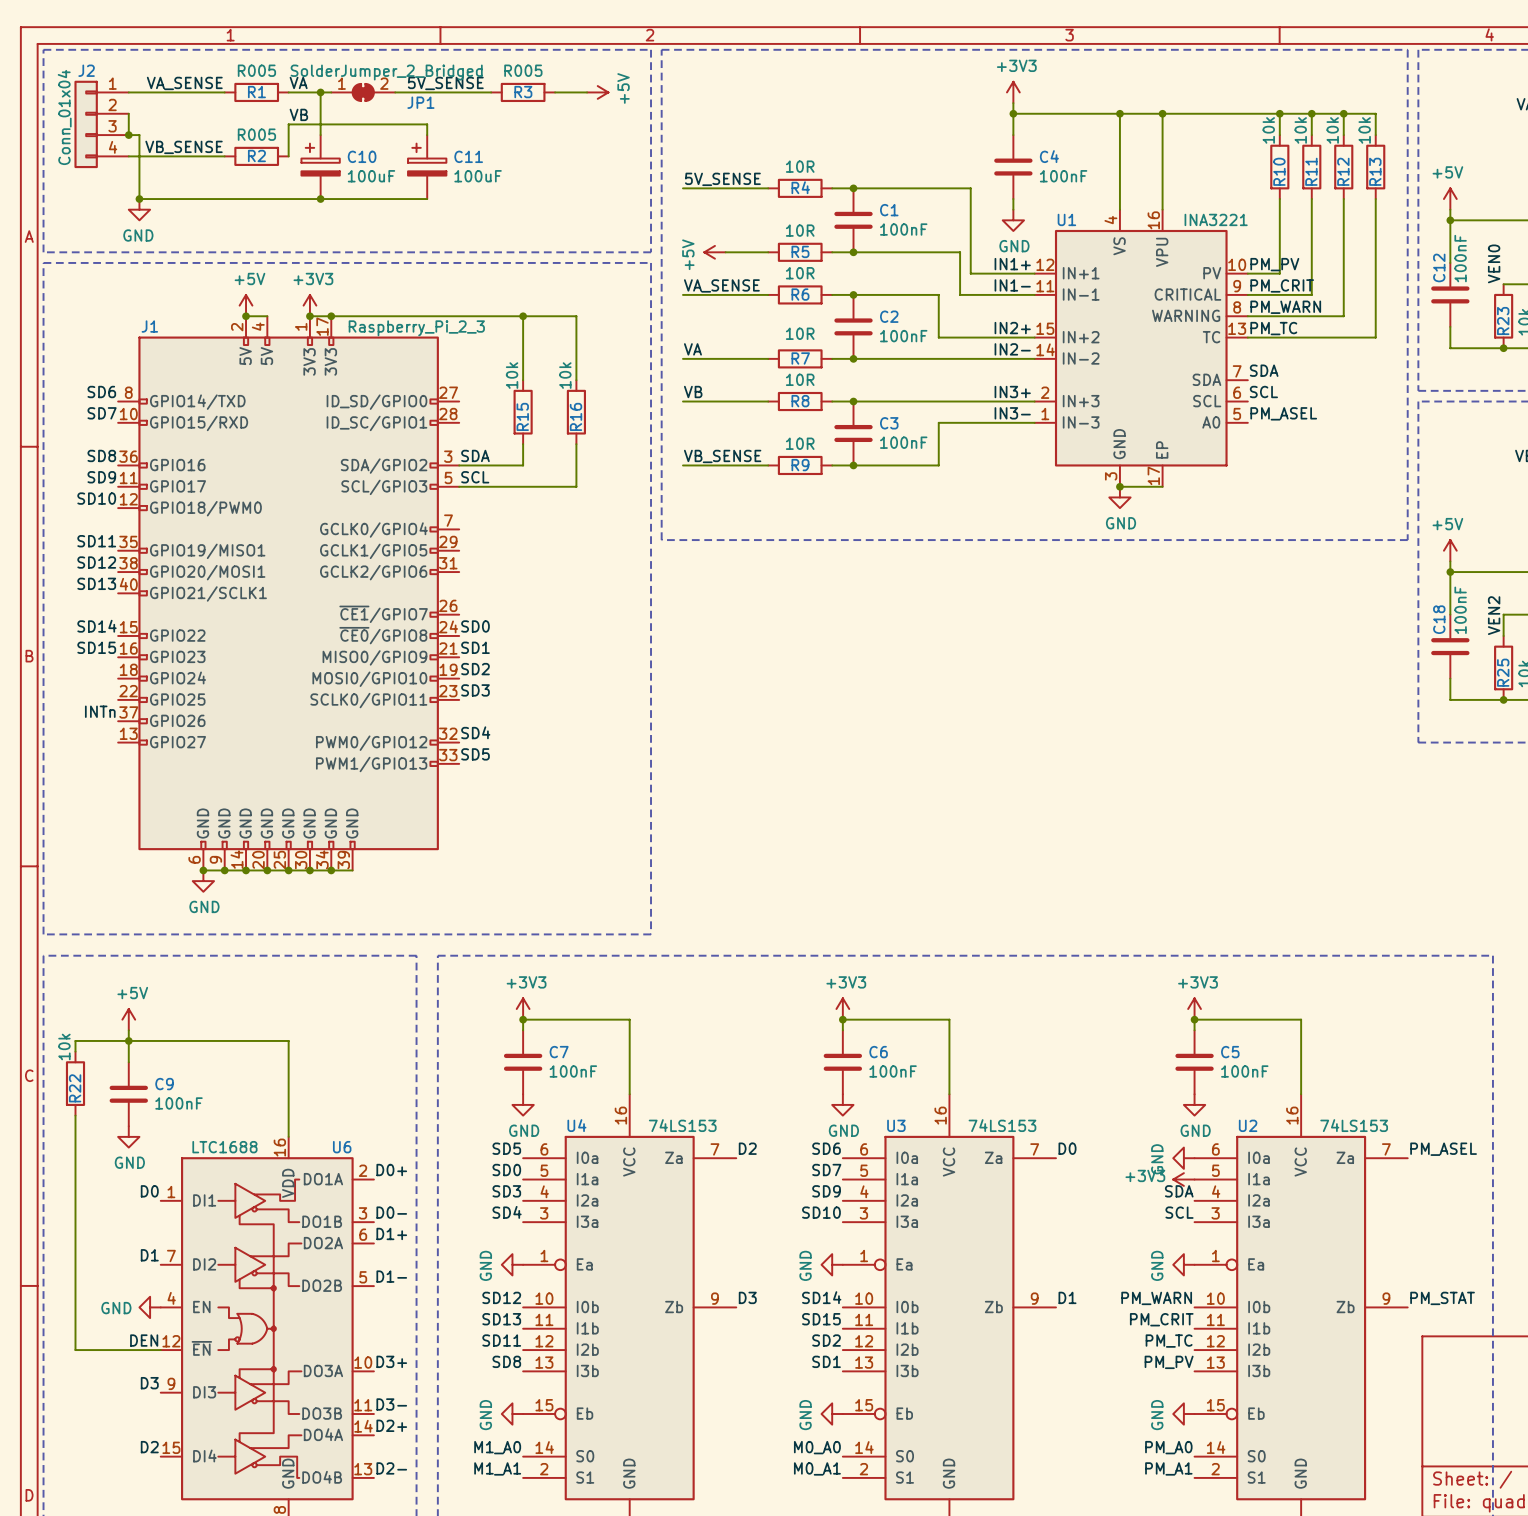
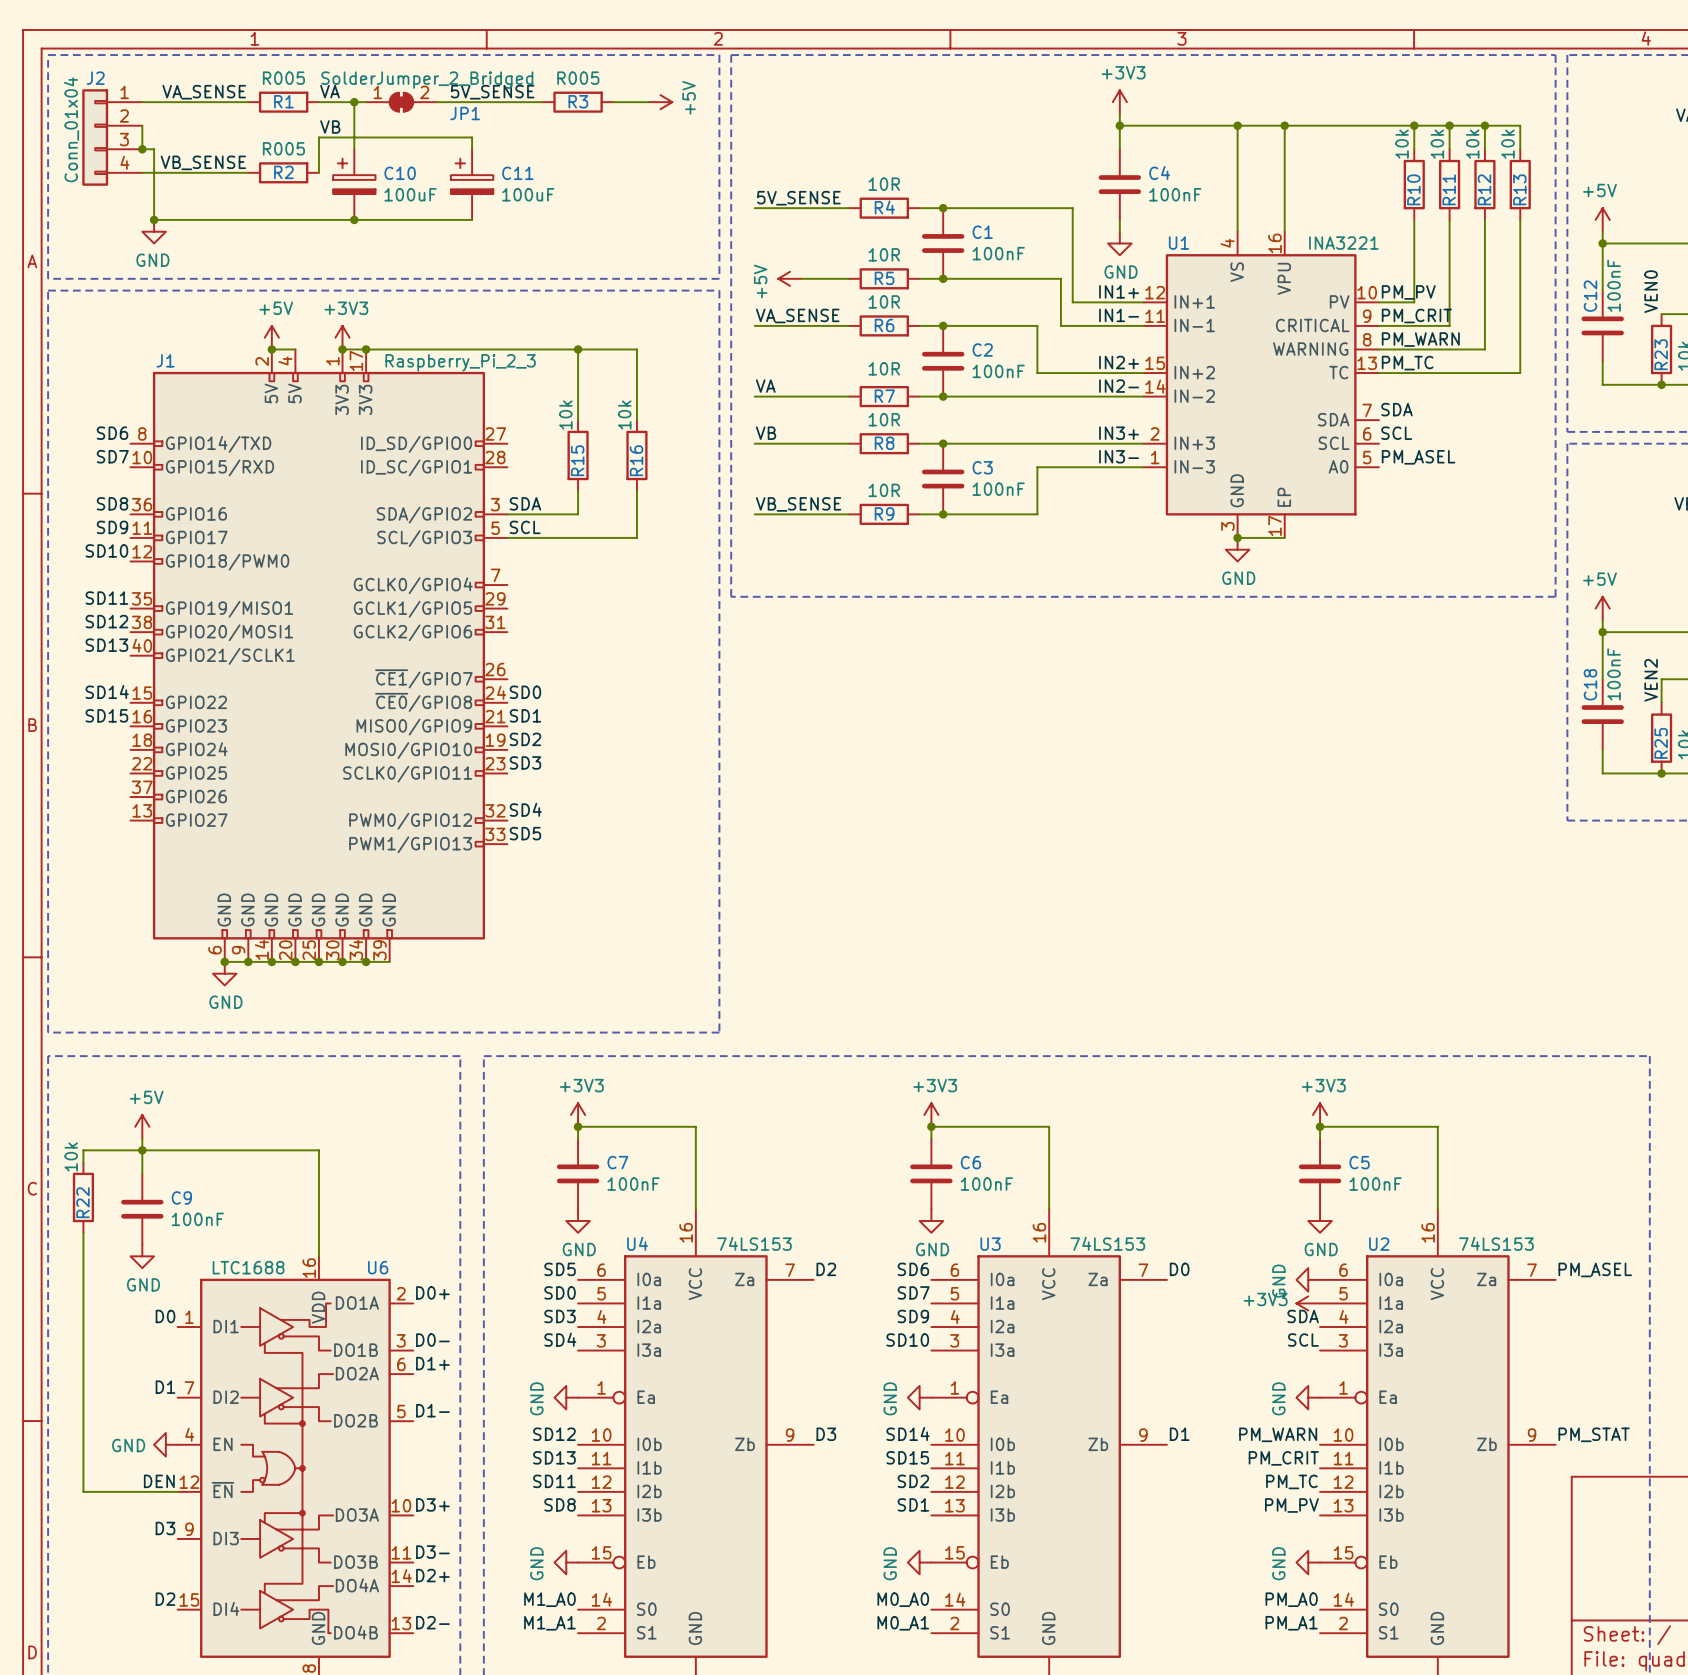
label: INTn (100, 711) -> none

